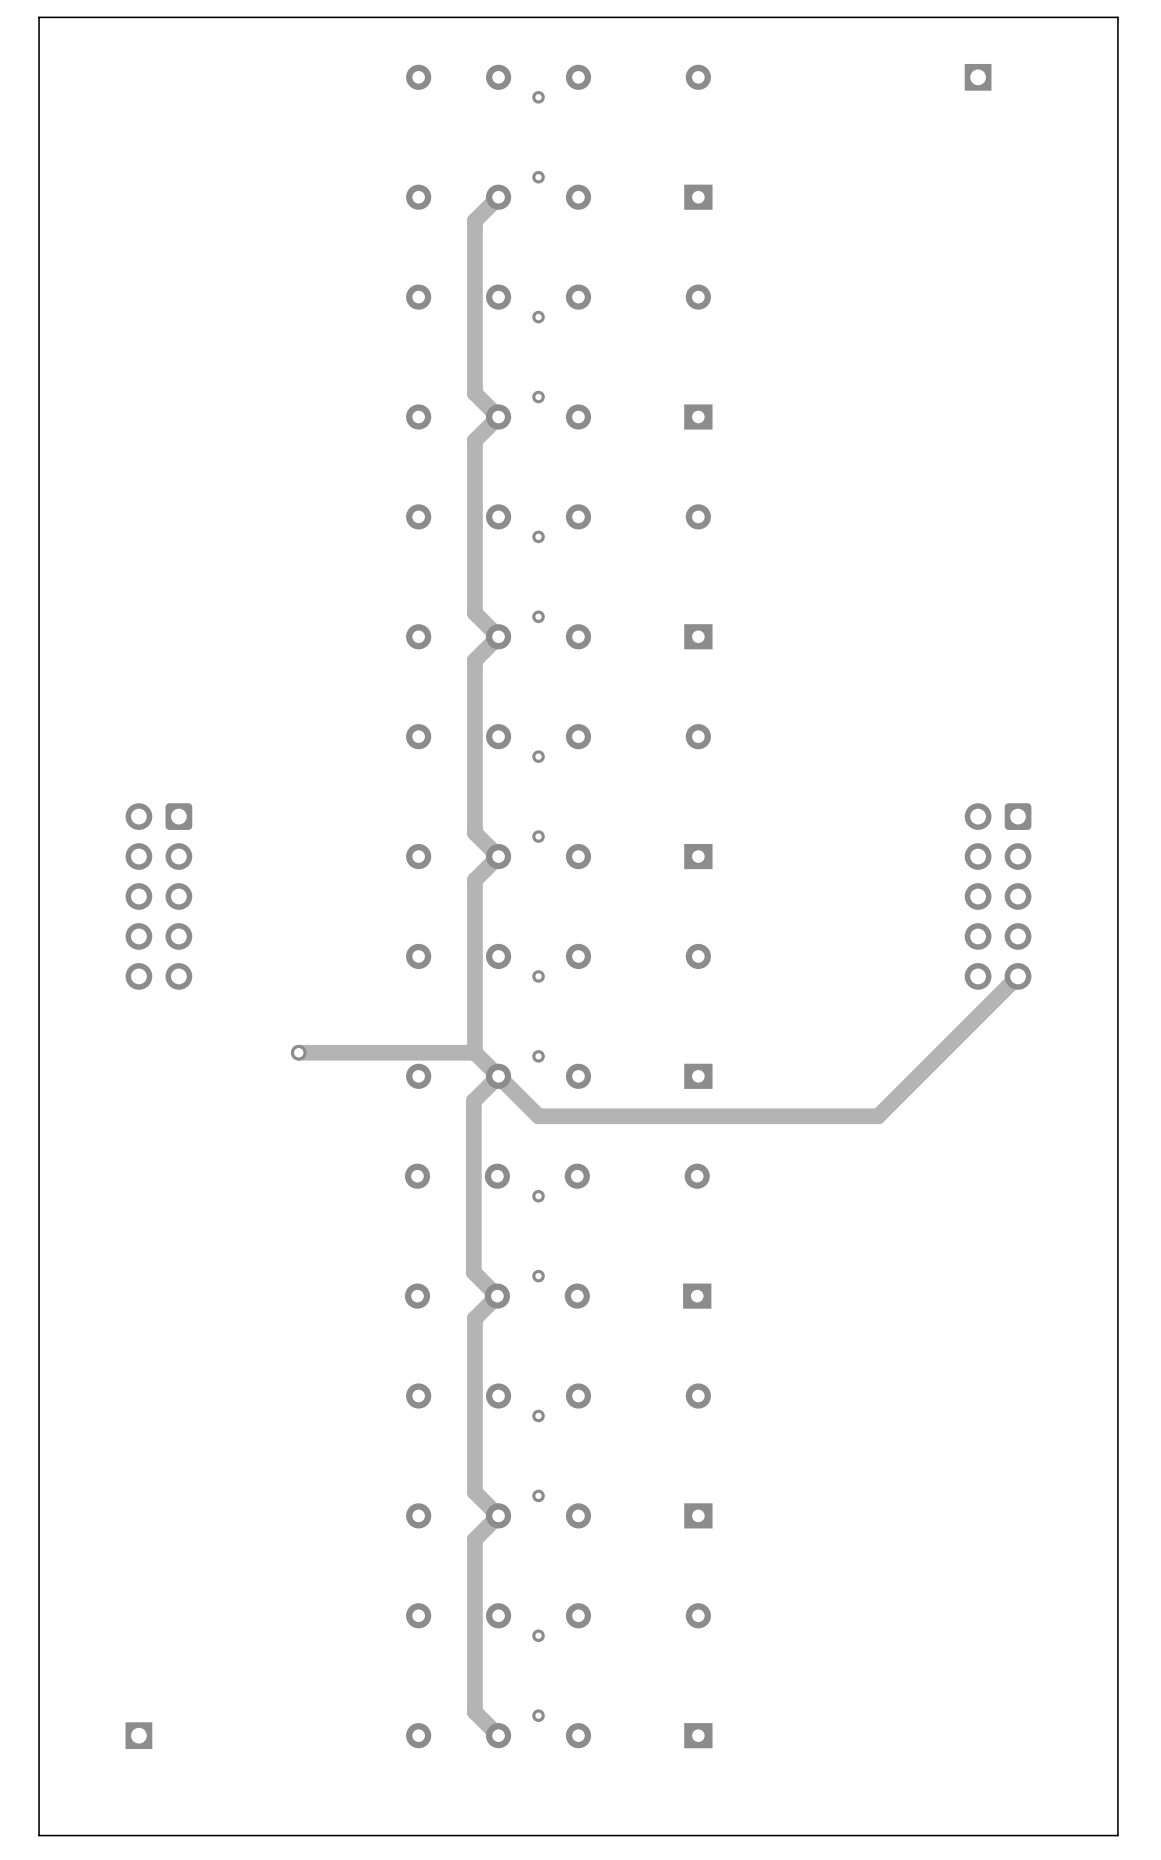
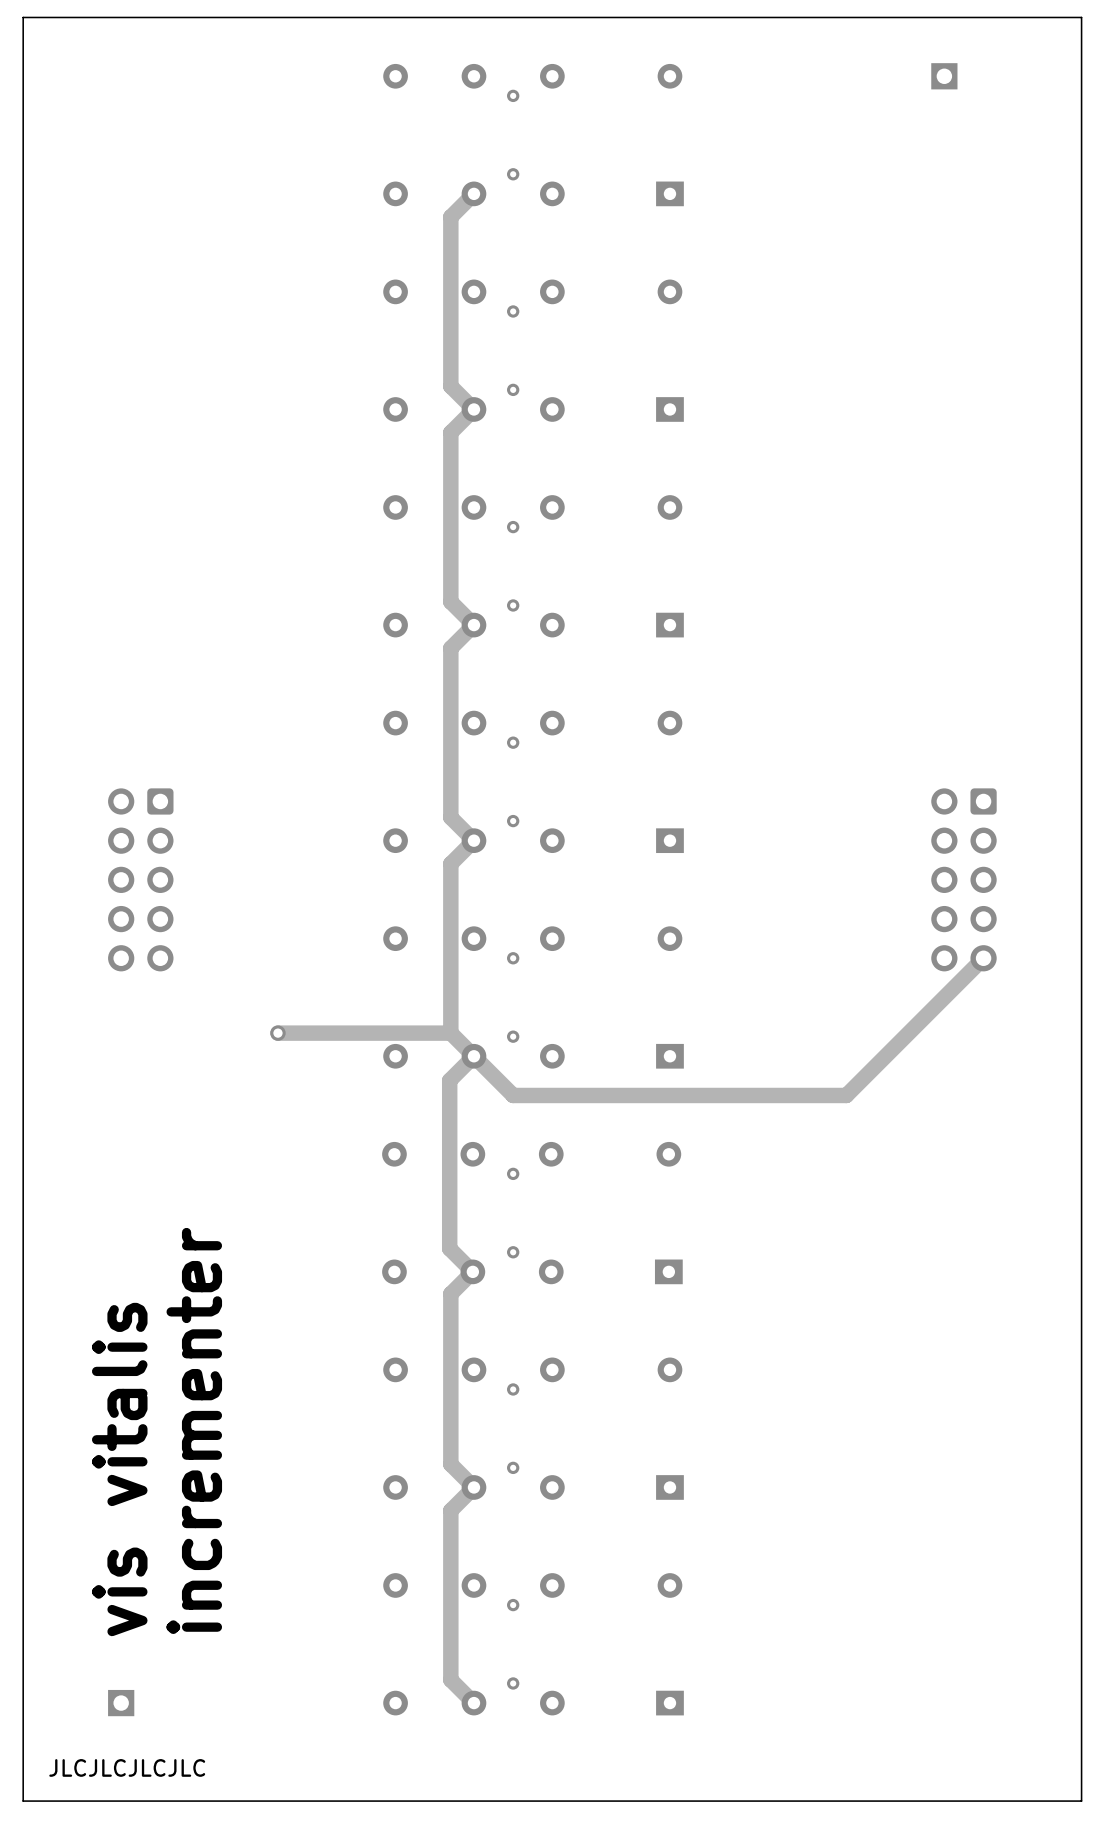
text: none -> incrementer (194, 1430)
text: none -> vis vitalis (119, 1469)
text: none -> JLCJLCJLCJLC (127, 1767)

